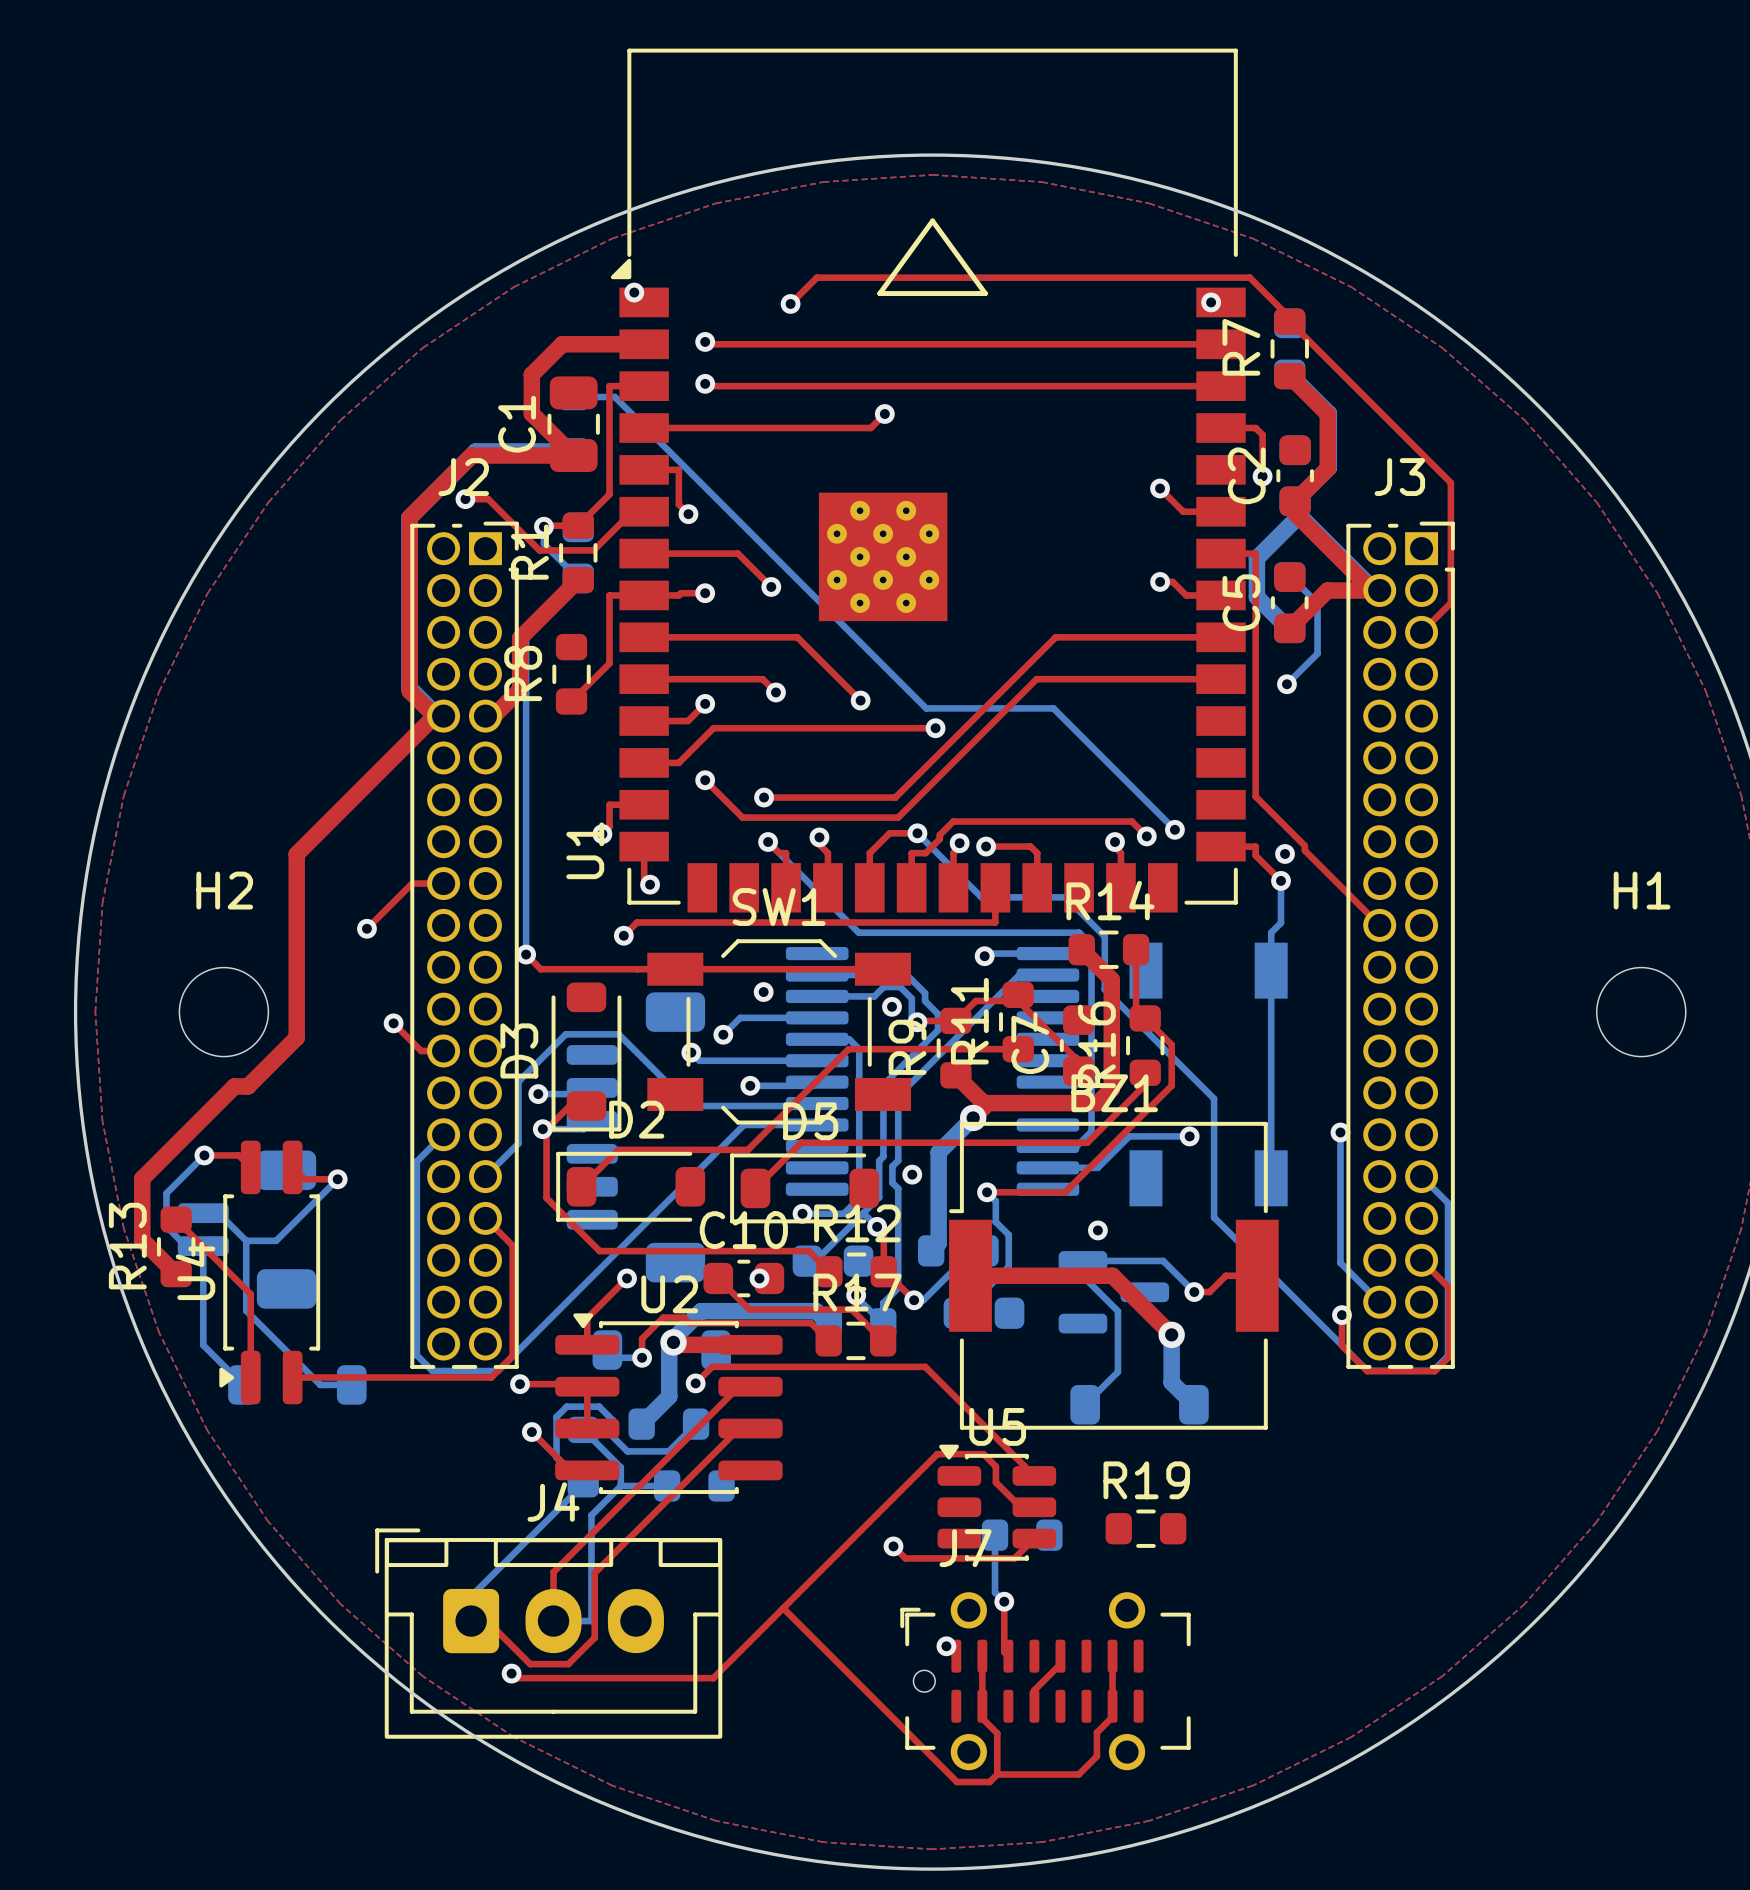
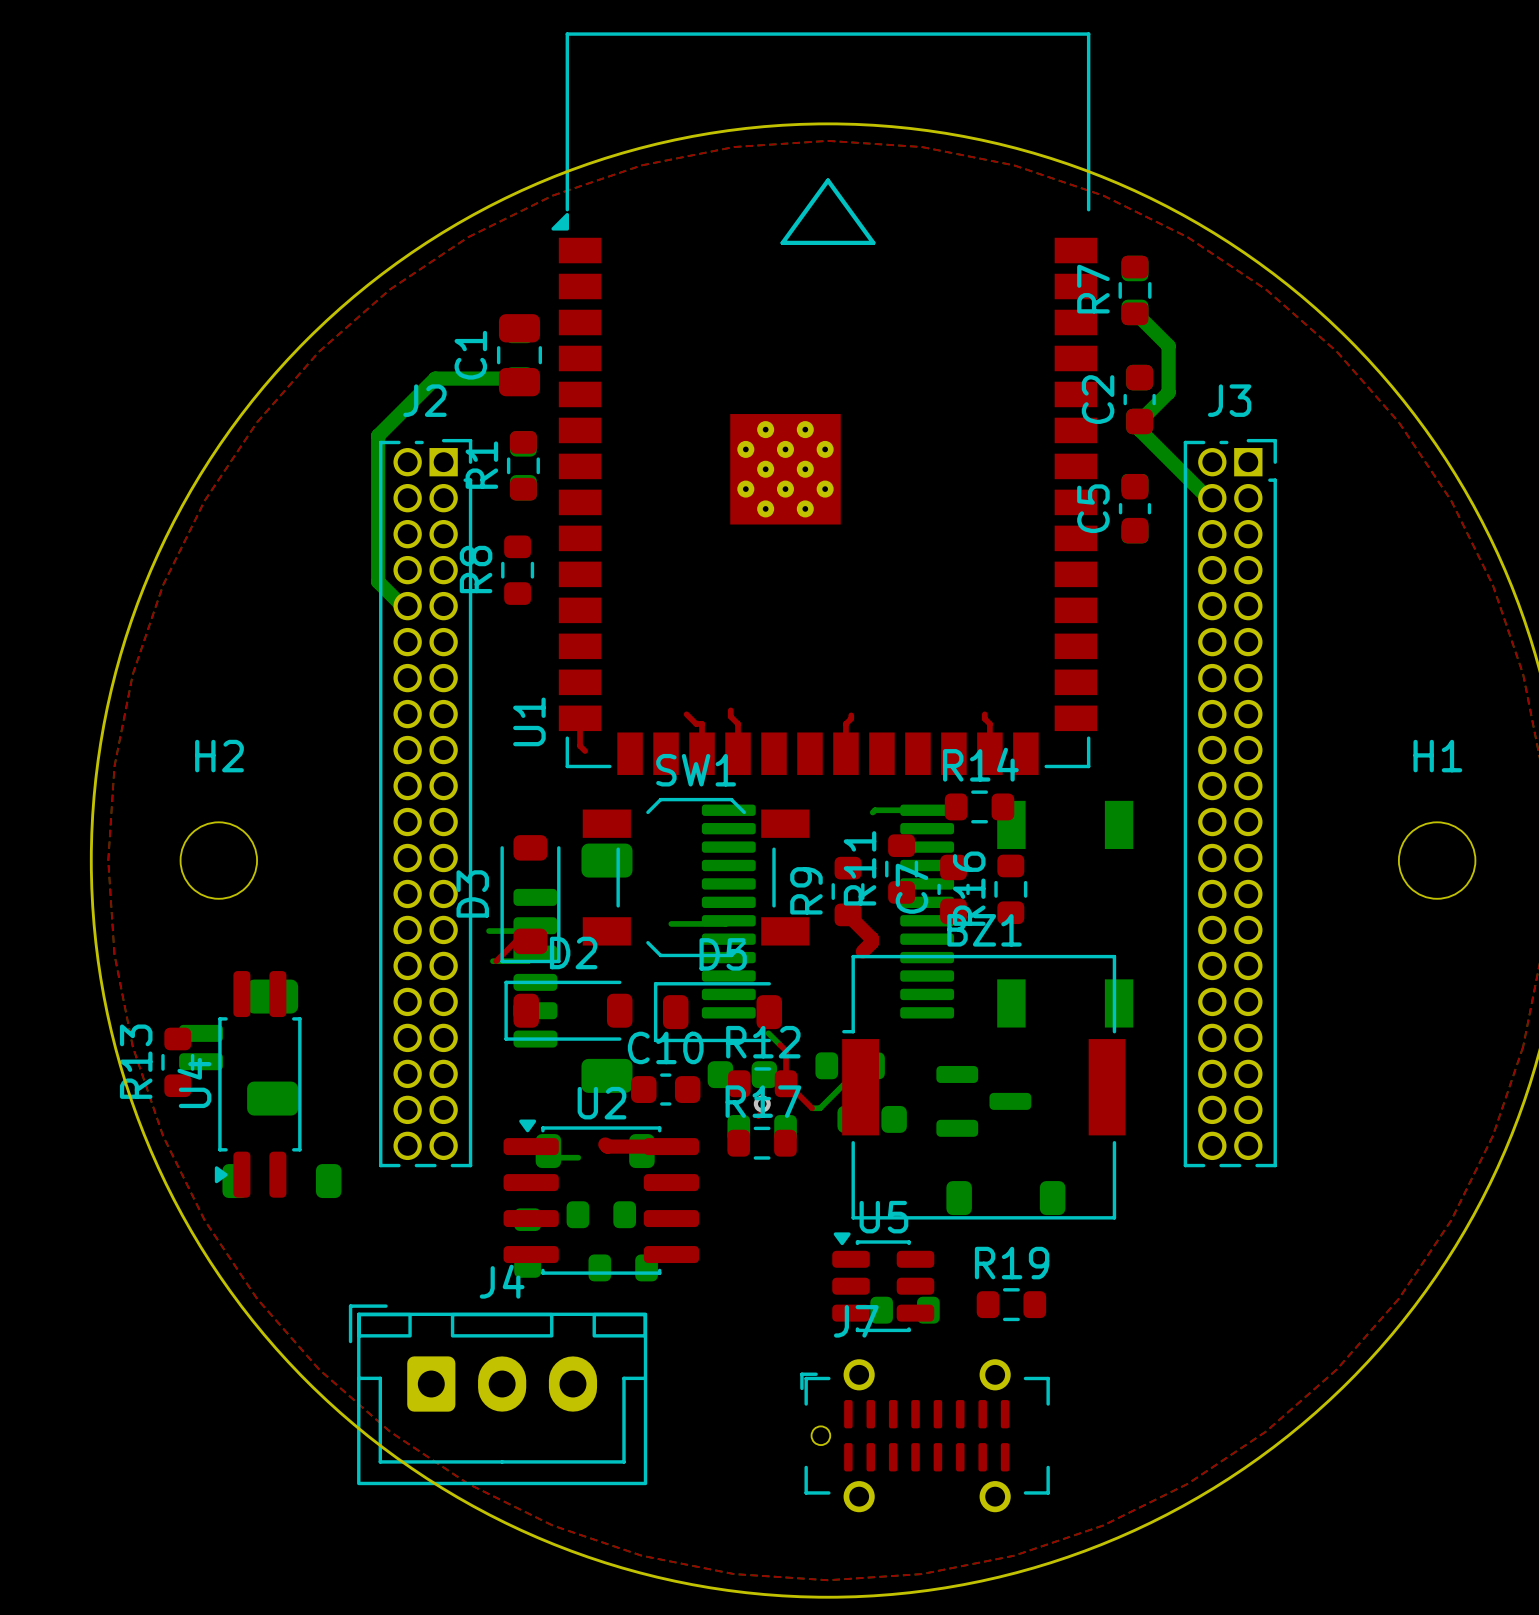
via: (634, 292) -> none
via: (1211, 302) -> none
top track: (790, 303) (816, 277) (1249, 277) (1289, 317) (1289, 321) (1450, 482) (1450, 603) (1421, 632) -> none
via: (790, 303) -> none
top track: (705, 341) (707, 344) (1221, 344) -> none
via: (705, 341) -> none
top track: (644, 344) (562, 344) (531, 374) (531, 413) (573, 455) (471, 455) (409, 517) (409, 691) (434, 716) -> none
top track: (1289, 376) (1327, 414) (1327, 468) (1295, 501) (1295, 513) (1372, 590) -> none
top track: (705, 383) (707, 386) (1221, 386) -> none
via: (705, 383) -> none
top track: (644, 386) (609, 386) (609, 494) (578, 525) (543, 526) -> none
bottom track: (573, 397) (614, 397) (926, 708) (1053, 708) (1174, 829) -> none
top track: (884, 414) (870, 428) (644, 428) -> none
via: (884, 414) -> none
top track: (1221, 428) (1255, 428) (1262, 434) (1262, 476) -> none
top track: (644, 469) (678, 469) (678, 504) (688, 514) -> none
via: (1262, 476) -> none
top track: (1160, 488) (1183, 511) (1221, 511) -> none
via: (1160, 488) -> none
top track: (465, 499) (488, 499) (539, 550) (593, 550) (632, 511) (644, 511) -> none
via: (465, 499) -> none
via: (688, 514) -> none
bottom track: (1299, 515) (1256, 558) (1256, 597) (1289, 629) -> none
bottom track: (543, 526) (543, 544) (578, 578) (526, 630) (526, 954) -> none
via: (543, 526) -> none
top track: (644, 553) (737, 553) (771, 586) -> none
top track: (1221, 553) (1255, 553) (1255, 796) (1304, 845) (1304, 850) (1379, 925) -> none
bottom track: (1289, 575) (1317, 603) (1317, 653) (1286, 684) -> none
top track: (578, 580) (520, 638) (520, 689) (493, 716) (485, 716) -> none
top track: (1160, 581) (1172, 581) (1186, 595) (1221, 595) -> none
via: (1160, 581) -> none
via: (771, 586) -> none
top track: (1379, 590) (1327, 590) (1289, 628) -> none
top track: (705, 593) (681, 593) (678, 595) (609, 595) (609, 663) (571, 701) -> none
via: (705, 593) -> none
top track: (644, 637) (797, 637) (860, 700) -> none
top track: (1221, 637) (1055, 637) (895, 797) (764, 797) -> none
top track: (644, 679) (762, 679) (775, 692) -> none
top track: (1221, 679) (1036, 679) (898, 817) (742, 817) (705, 780) -> none
via: (1286, 684) -> none
via: (775, 692) -> none
via: (860, 700) -> none
top track: (705, 703) (688, 721) (644, 721) -> none
via: (705, 703) -> none
top track: (434, 716) (296, 854) (296, 1037) (248, 1086) (234, 1086) (142, 1178) (142, 1240) (176, 1274) -> none
top track: (935, 728) (713, 728) (678, 762) (644, 762) -> none
via: (935, 728) -> none
via: (705, 780) -> none
via: (764, 797) -> none
top track: (644, 804) (609, 804) (609, 826) (602, 834) -> none
via: (1174, 829) -> none
top track: (917, 833) (889, 833) (869, 853) (869, 887) -> none
bottom track: (917, 833) (981, 897) (1065, 897) (1104, 936) (1104, 989) (1214, 1098) (1214, 1217) (1367, 1370) (1433, 1370) (1448, 1355) (1448, 1203) (1421, 1176) -> none
via: (917, 833) -> none
via: (602, 834) -> none
top track: (1146, 836) (1131, 821) (953, 821) (925, 853) (911, 853) (911, 887) -> none
via: (1146, 836) -> none
via: (819, 837) -> none
bottom track: (768, 842) (858, 932) (1079, 932) (1091, 945) (1091, 1131) (1076, 1146) (1047, 1146) -> none
via: (768, 842) -> none
via: (1115, 842) -> none
via: (959, 843) -> none
top track: (986, 846) (1030, 846) (1037, 853) (1037, 887) -> none
via: (986, 846) -> none
top track: (1221, 846) (1255, 846) (1255, 855) (1281, 880) -> none
via: (1285, 853) -> none
bottom track: (1281, 880) (1281, 922) (1271, 932) (1271, 1178) -> none
via: (1281, 880) -> none
top track: (443, 883) (412, 883) (366, 928) -> none
via: (650, 884) -> none
top track: (995, 887) (995, 922) (637, 922) (623, 935) -> none
via: (366, 928) -> none
via: (623, 935) -> none
top track: (1081, 949) (1111, 979) (1111, 1089) (1097, 1103) (983, 1103) -> none
top track: (1136, 949) (1136, 1009) (1171, 1044) (1171, 1085) (1065, 1192) (987, 1192) -> none
top track: (526, 954) (540, 969) (882, 969) -> none
via: (526, 954) -> none
via: (984, 956) -> none
bottom track: (817, 975) (905, 973) (925, 993) (925, 1001) (938, 1014) (938, 1030) (883, 1084) (883, 1156) (879, 1160) (879, 1197) (815, 1261) (807, 1261) -> none
bottom track: (1047, 975) (1019, 975) (898, 1096) (898, 1160) (892, 1166) (892, 1182) (898, 1188) (898, 1288) (883, 1303) (883, 1323) (856, 1295) -> none
via: (763, 992) -> none
bottom track: (817, 996) (874, 996) (883, 987) (900, 987) (911, 998) (911, 1016) (917, 1022) -> none
top track: (1018, 1000) (1078, 1061) (1078, 1071) -> none
top track: (1018, 1000) (975, 1000) (955, 1020) (917, 1022) -> none
via: (892, 1006) -> none
bottom track: (817, 1017) (740, 1017) (723, 1034) -> none
via: (917, 1022) -> none
top track: (393, 1023) (421, 1050) (443, 1050) -> none
via: (393, 1023) -> none
via: (723, 1034) -> none
bottom track: (817, 1039) (849, 1039) (859, 1049) (859, 1198) (843, 1213) (802, 1213) -> none
top track: (1018, 1049) (848, 1049) (747, 1149) (618, 1149) (581, 1186) -> none
bottom track: (691, 1052) (699, 1060) (817, 1060) -> none
via: (691, 1052) -> none
top track: (1145, 1072) (1145, 1084) (1087, 1142) (801, 1142) (755, 1188) -> none
via: (750, 1085) -> none
via: (538, 1094) -> none
bottom track: (817, 1103) (814, 1106) (690, 1106) (618, 1034) (565, 1034) (518, 1081) (518, 1143) (485, 1176) -> none
bottom track: (973, 1117) (938, 1152) (938, 1243) (931, 1250) -> none
via: (973, 1117) -> none
bottom track: (817, 1124) (744, 1124) (497, 1371) (432, 1371) (416, 1355) (416, 1161) (443, 1134) -> none
top track: (542, 1129) (546, 1129) (546, 1198) (599, 1251) (808, 1251) (829, 1271) -> none
via: (542, 1129) -> none
bottom track: (1340, 1132) (1340, 1262) (1379, 1302) -> none
via: (1340, 1132) -> none
bottom track: (1189, 1136) (1129, 1136) (1097, 1167) (1047, 1167) -> none
via: (1189, 1136) -> none
top track: (204, 1155) (238, 1155) (250, 1167) -> none
bottom track: (204, 1155) (166, 1193) (166, 1226) (185, 1246) (203, 1246) (203, 1345) (242, 1384) -> none
via: (204, 1155) -> none
top track: (292, 1167) (304, 1179) (337, 1179) -> none
via: (912, 1174) -> none
bottom track: (337, 1179) (276, 1240) (246, 1240) -> none
via: (337, 1179) -> none
bottom track: (987, 1192) (995, 1201) (995, 1222) (1008, 1234) (1008, 1266) (962, 1313) (958, 1313) -> none
via: (987, 1192) -> none
bottom track: (203, 1213) (218, 1213) (246, 1240) -> none
via: (802, 1213) -> none
top track: (485, 1218) (512, 1245) (512, 1356) (491, 1377) (292, 1377) -> none
top track: (176, 1219) (250, 1294) (250, 1377) -> none
via: (877, 1226) -> none
via: (1097, 1230) -> none
bottom track: (246, 1240) (246, 1310) (320, 1384) (351, 1384) -> none
top track: (1421, 1260) (1449, 1287) (1449, 1357) (1434, 1371) (1367, 1371) (1341, 1345) (1341, 1315) -> none
top track: (970, 1275) (1112, 1275) (1171, 1334) -> none
top track: (1257, 1275) (1225, 1275) (1209, 1292) (1194, 1292) -> none
top track: (626, 1278) (587, 1318) (587, 1344) -> none
via: (626, 1278) -> none
top track: (718, 1278) (749, 1309) (851, 1309) (883, 1340) -> none
via: (759, 1278) -> none
bottom track: (1194, 1292) (1163, 1260) (1082, 1260) (1082, 1276) (1117, 1311) (1117, 1371) (1085, 1404) -> none
via: (1194, 1292) -> none
via: (914, 1300) -> none
via: (1341, 1315) -> none
bottom track: (828, 1323) (816, 1311) (701, 1311) (673, 1338) (673, 1342) (669, 1346) (669, 1396) (641, 1424) -> none
bottom track: (1171, 1334) (1171, 1382) (1193, 1404) -> none
via: (1171, 1334) -> none
top track: (828, 1340) (810, 1323) (689, 1323) (683, 1317) (663, 1317) (642, 1338) (642, 1357) -> none
via: (673, 1342) -> none
via: (642, 1357) -> none
top track: (695, 1383) (712, 1366) (925, 1366) (1034, 1475) -> none
via: (695, 1383) -> none
top track: (520, 1384) (584, 1384) (587, 1386) (587, 1428) -> none
via: (520, 1384) -> none
top track: (750, 1386) (738, 1386) (553, 1572) (553, 1621) -> none
bottom track: (696, 1424) (668, 1451) (627, 1451) (612, 1436) (612, 1420) (599, 1406) (566, 1406) (556, 1416) (556, 1457) (583, 1484) (471, 1596) (471, 1621) -> none
top track: (750, 1428) (739, 1428) (594, 1572) (594, 1637) (568, 1664) (530, 1664) (487, 1621) (471, 1621) -> none
bottom track: (583, 1429) (620, 1467) (620, 1486) -> none
top track: (531, 1432) (570, 1470) (587, 1470) -> none
via: (531, 1432) -> none
bottom track: (620, 1486) (591, 1515) (591, 1621) (553, 1621) -> none
bottom track: (620, 1486) (667, 1486) -> none
top track: (1034, 1507) (1020, 1507) (995, 1482) (995, 1466) (983, 1454) (937, 1454) (713, 1678) (516, 1678) (511, 1673) -> none
bottom track: (995, 1535) (995, 1592) (1004, 1601) -> none
top track: (1034, 1538) (1014, 1558) (905, 1558) (893, 1546) -> none
via: (893, 1546) -> none
top track: (1004, 1601) (1004, 1652) (1008, 1656) -> none
via: (1004, 1601) -> none
top track: (783, 1608) (957, 1782) (989, 1782) (997, 1774) -> none
via: (946, 1646) -> none
top track: (982, 1656) (982, 1718) (997, 1733) (997, 1774) -> none
top track: (1060, 1656) (1060, 1664) (1034, 1690) (1034, 1706) -> none
top track: (1112, 1656) (1112, 1716) (1096, 1732) (1096, 1756) (1078, 1774) (997, 1774) -> none
via: (511, 1673) -> none

